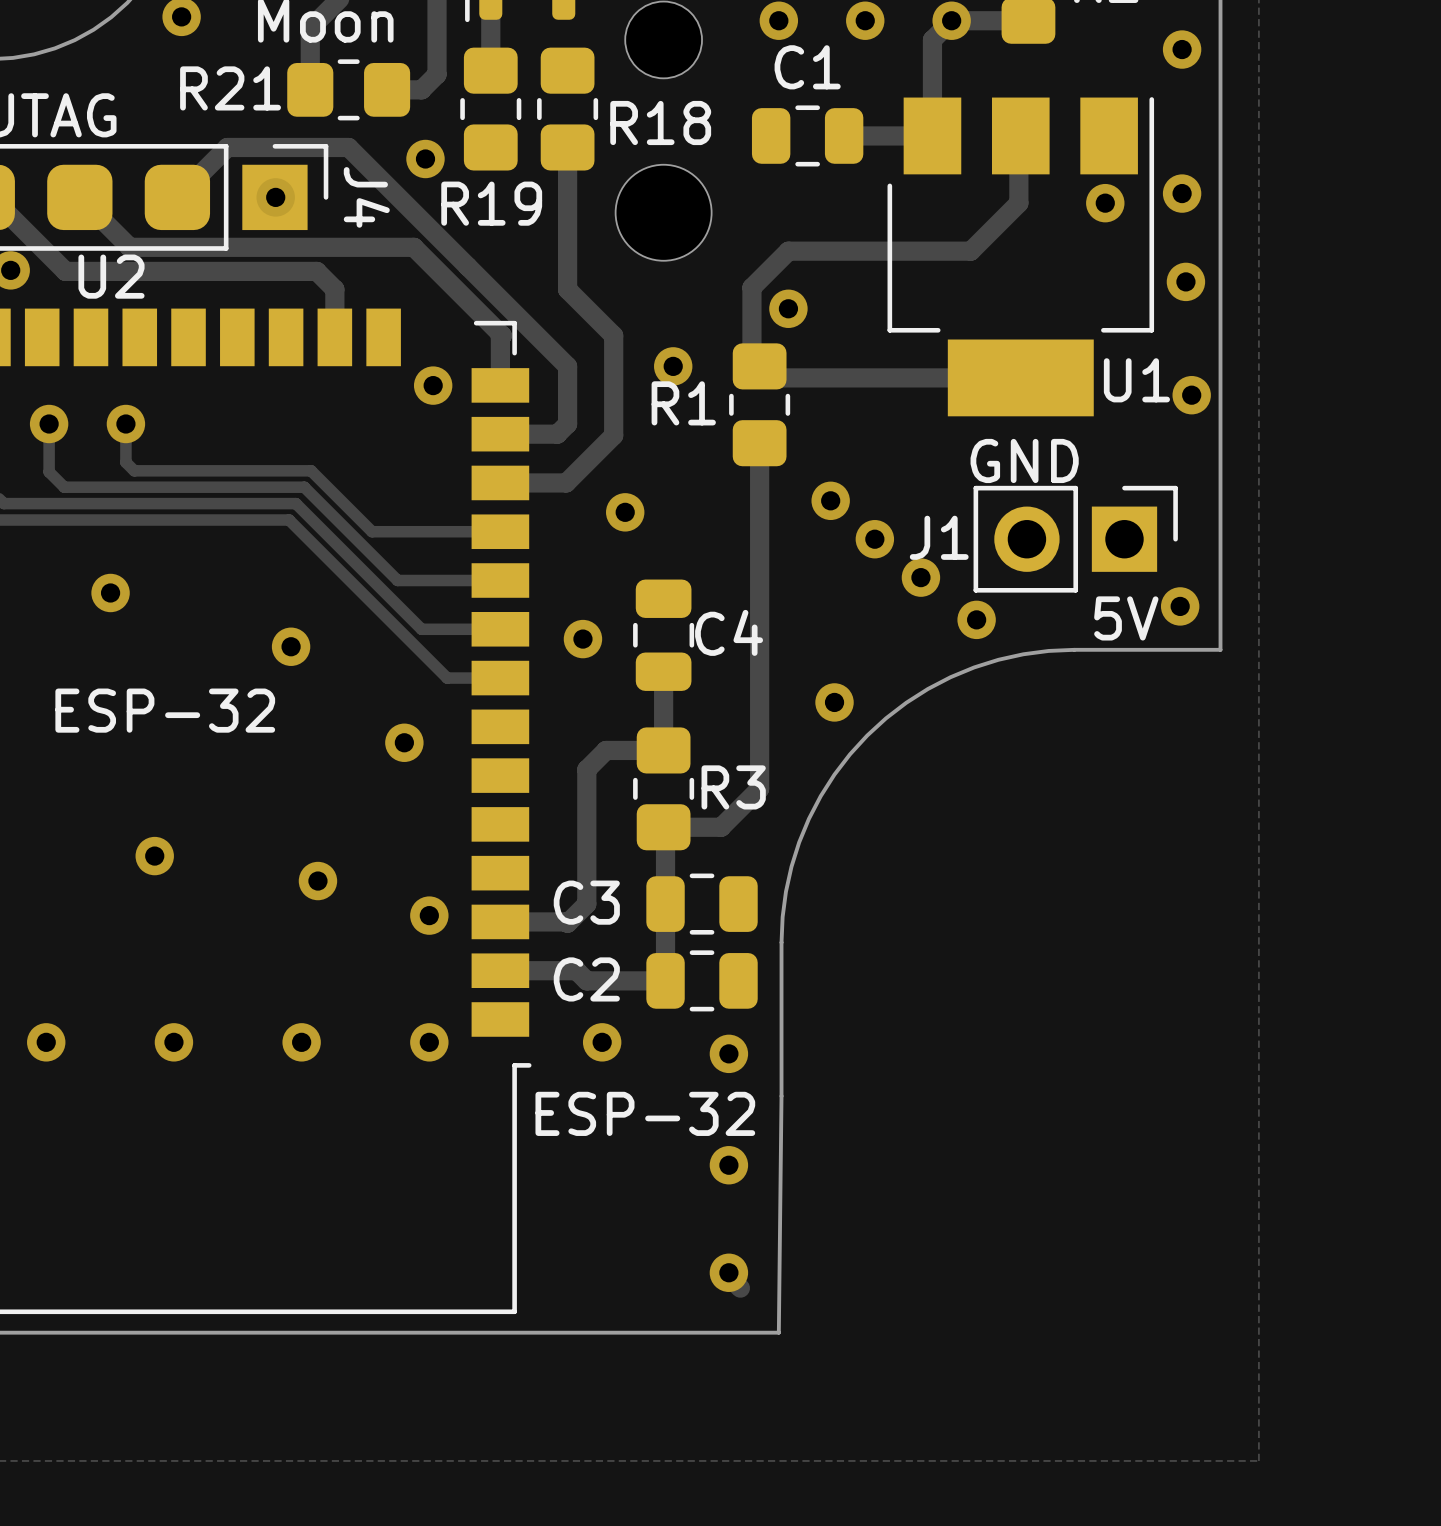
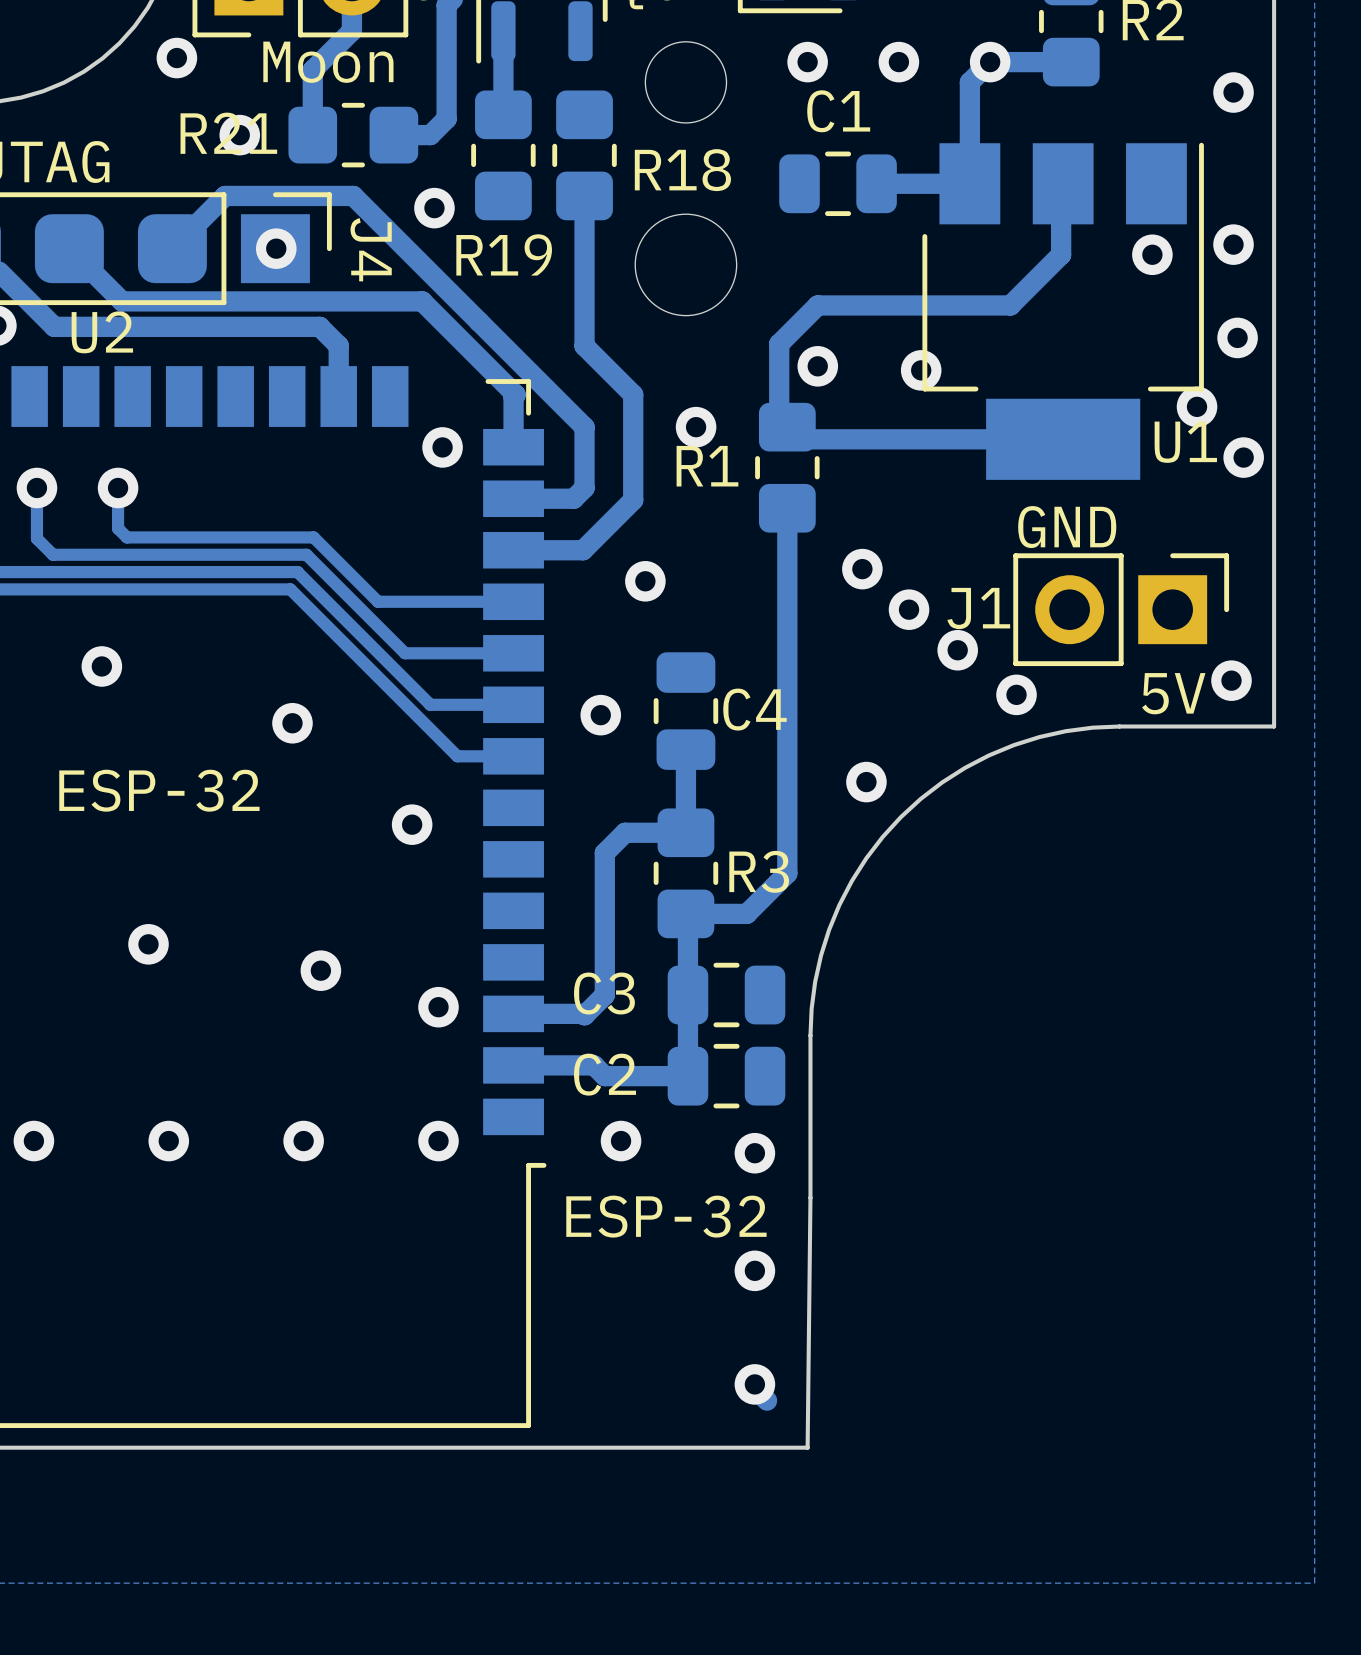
via: none -> (239, 135)
via: none -> (921, 370)
via: none -> (1197, 406)

